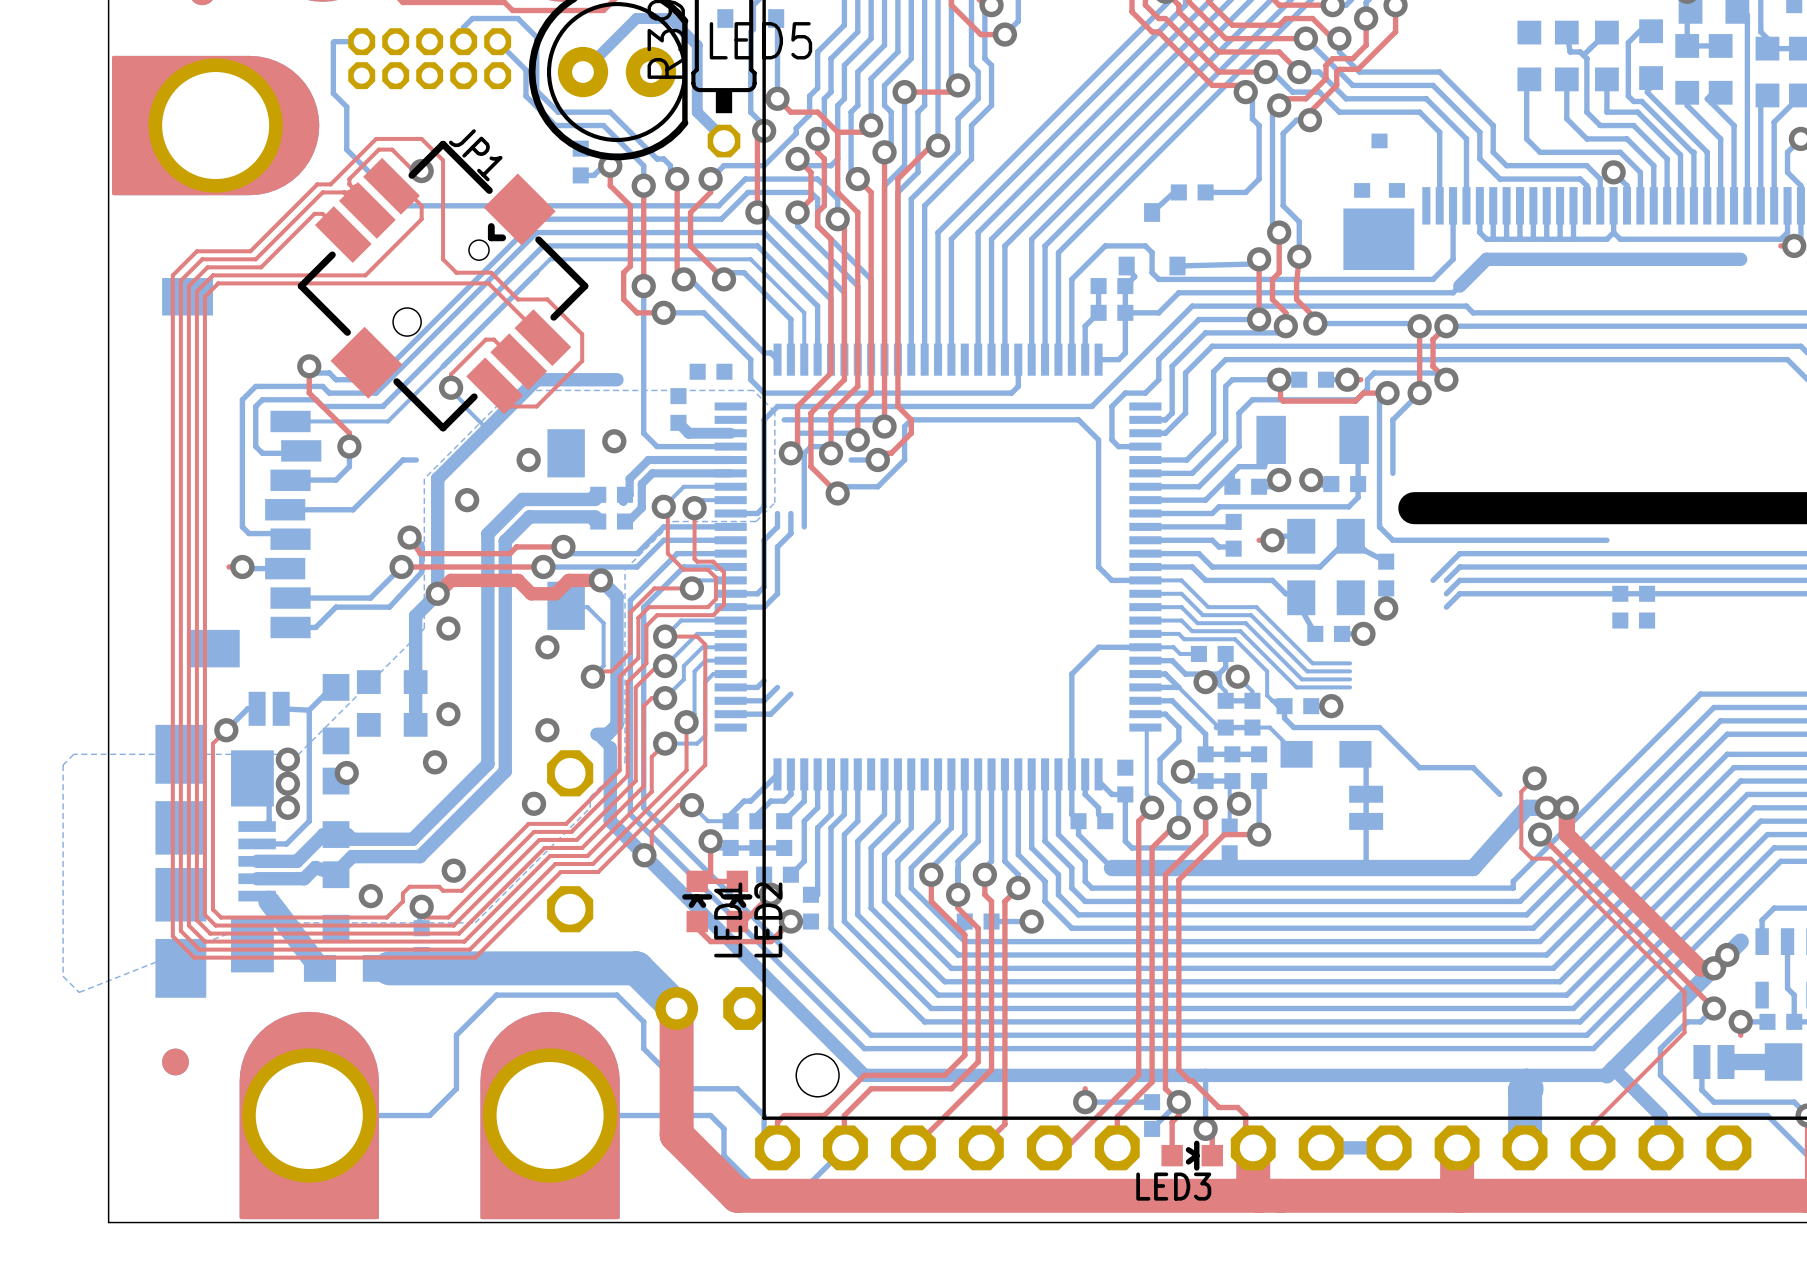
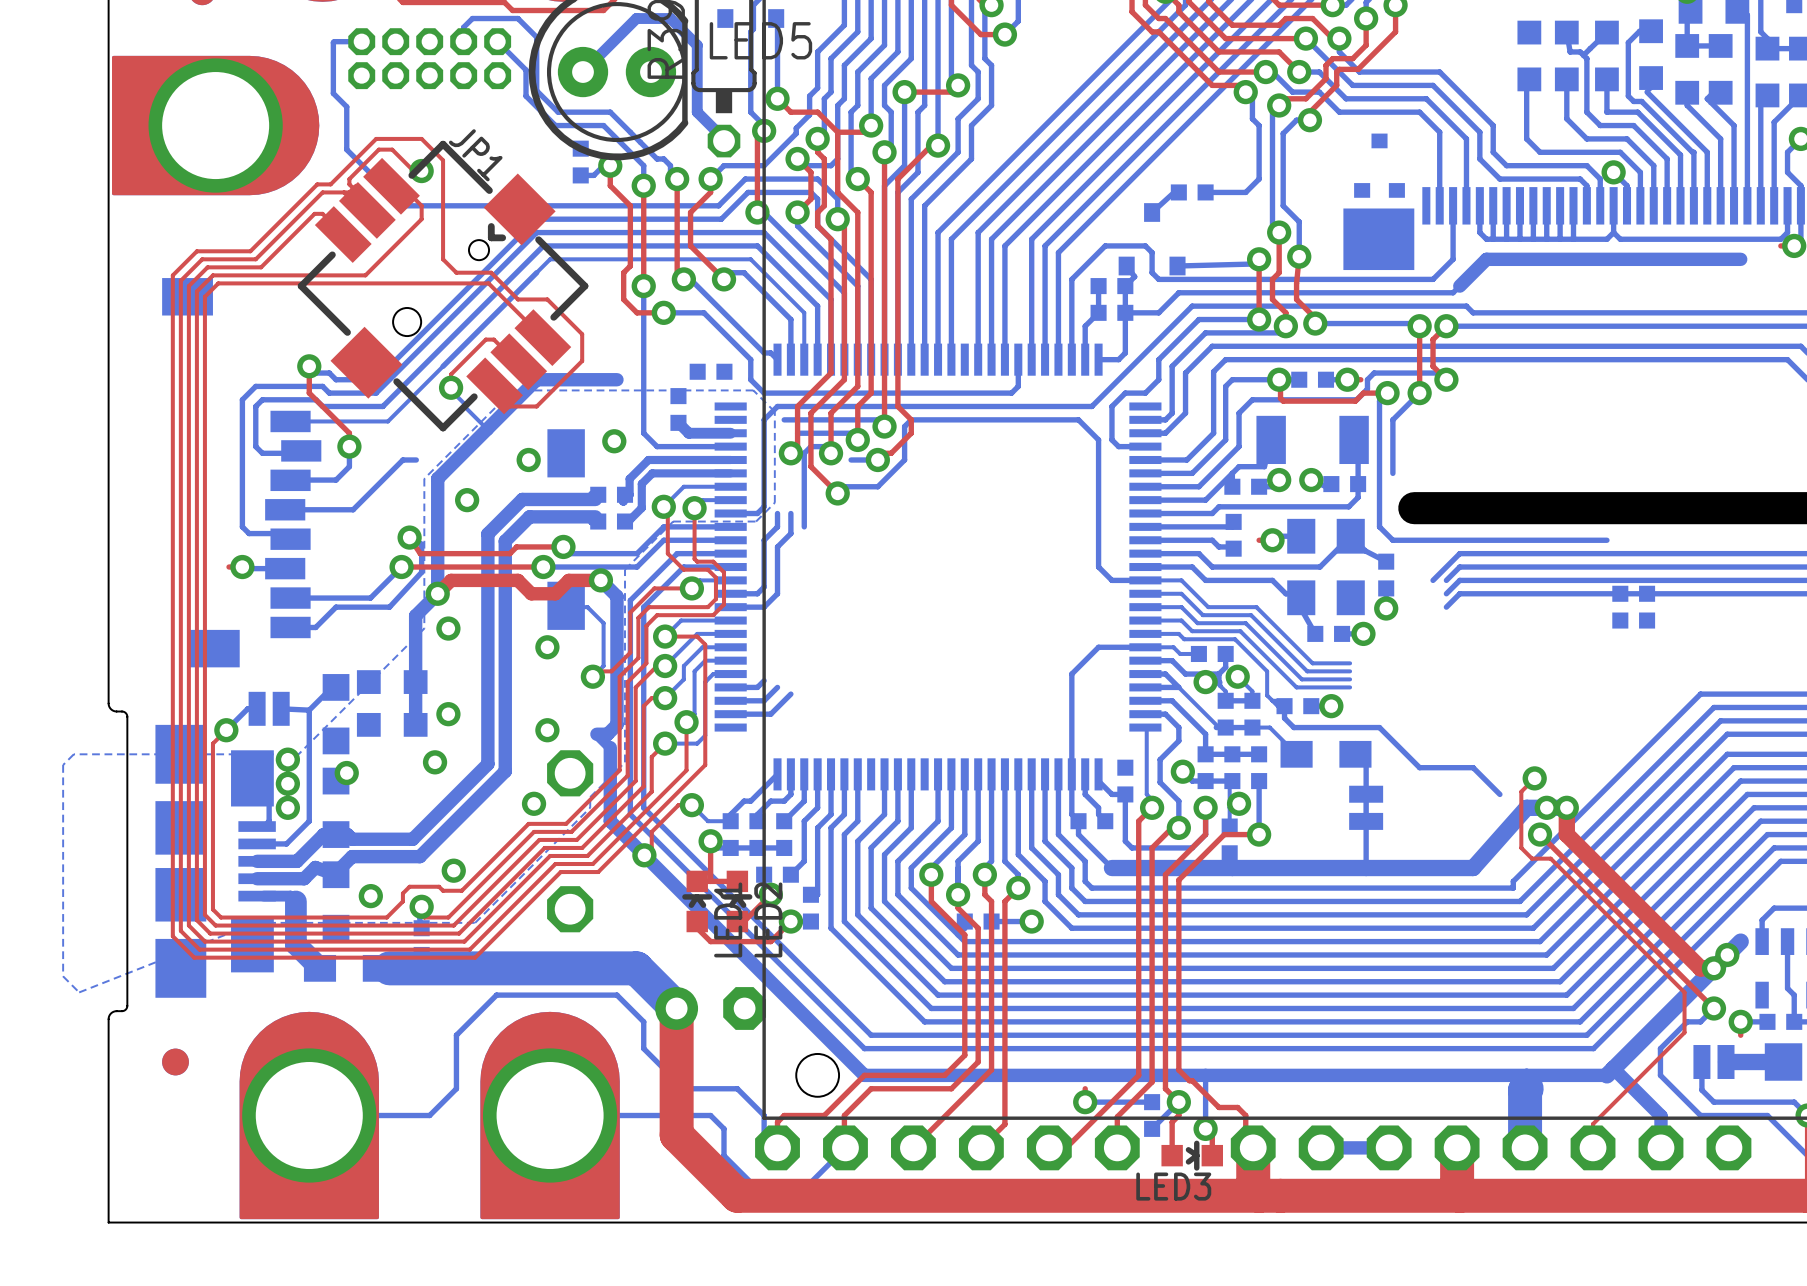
board edge: (108, 703) (108, 1019) -> (108, 703) (111, 709) (124, 711) (127, 716) (127, 1005) (124, 1010) (111, 1012) (108, 1019)
bottom track: (263, 896) (319, 968) -> (263, 896) (290, 896) (295, 901) (295, 944) (319, 968)

